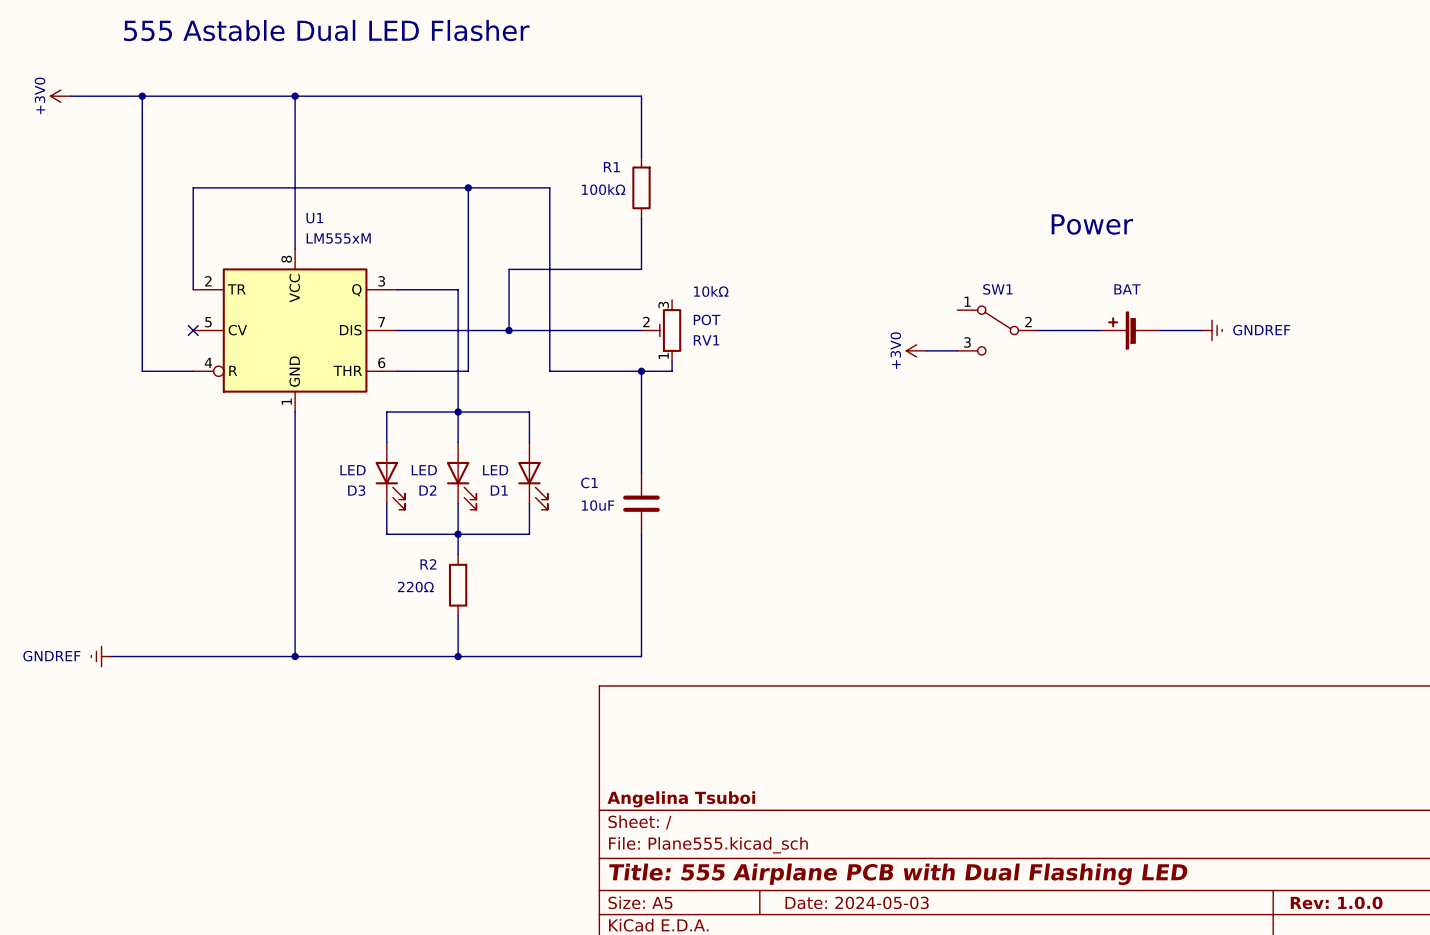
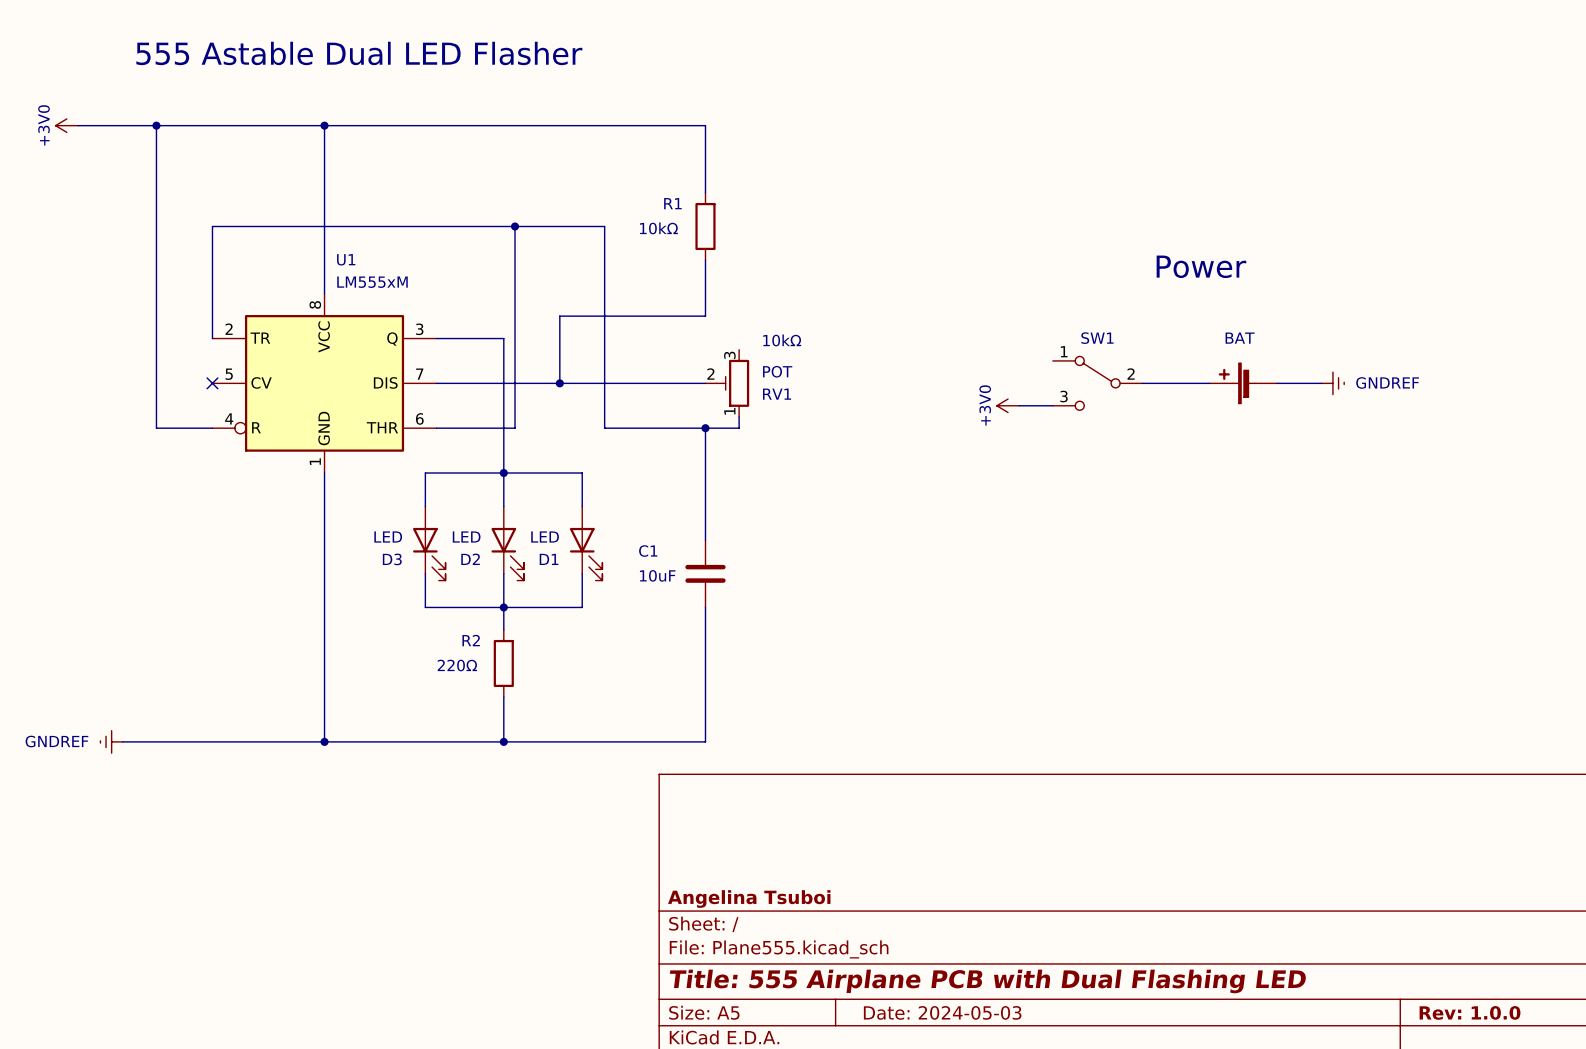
text: 100kΩ (603, 189) -> 10kΩ (658, 228)

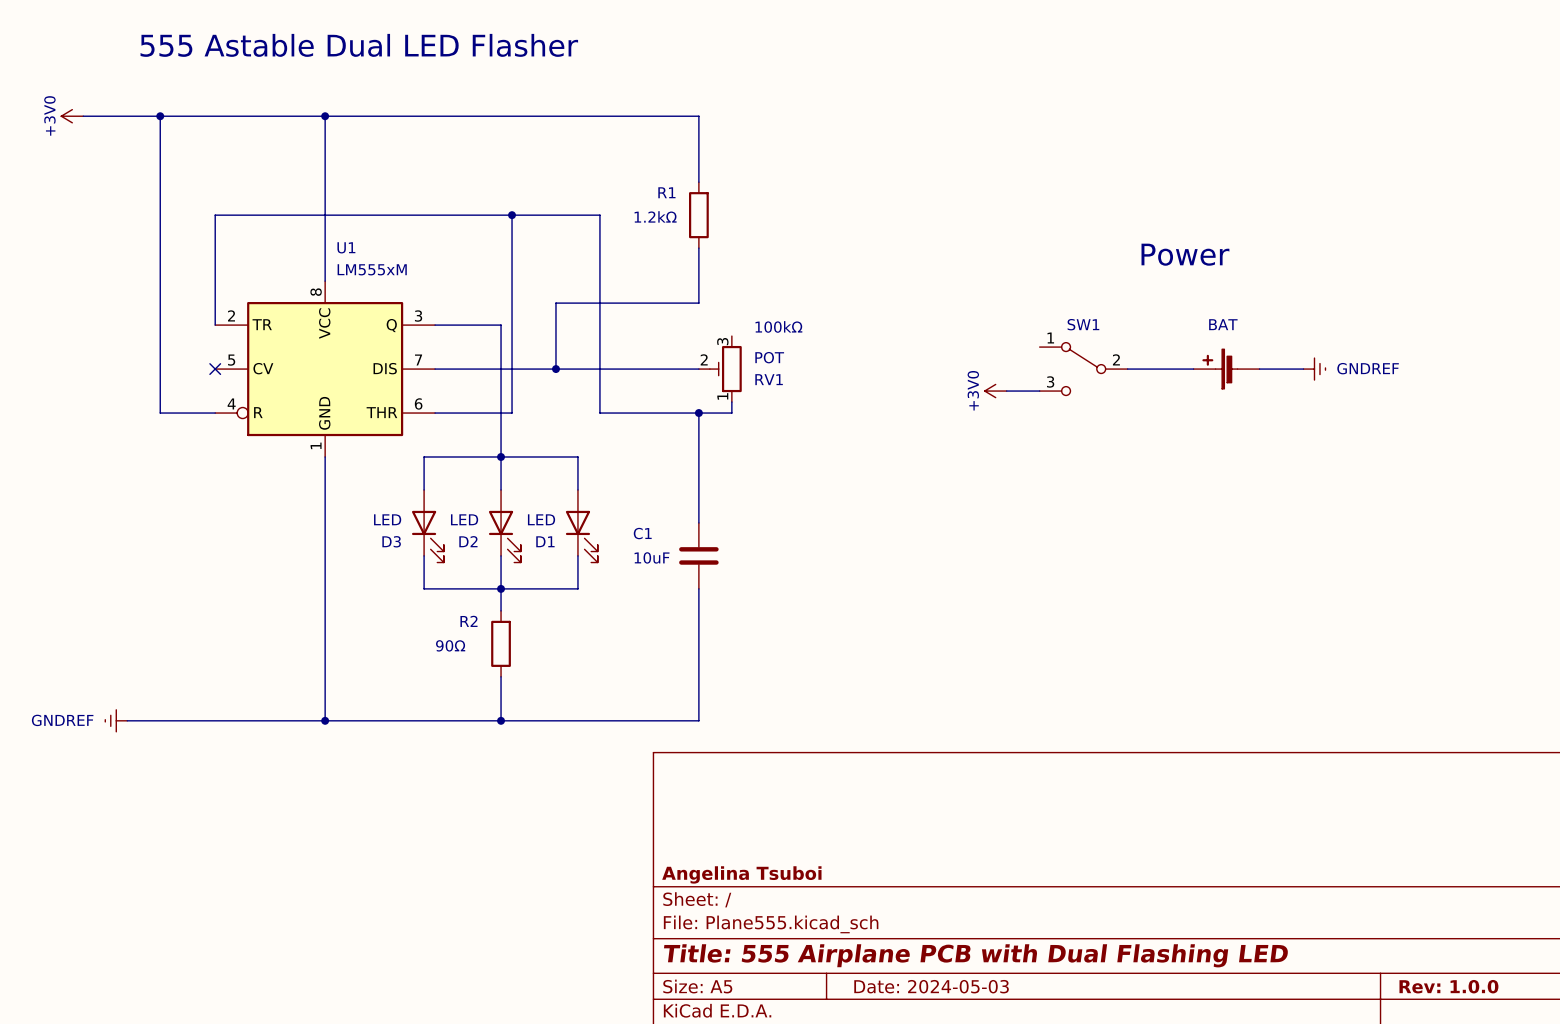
text: 10kΩ (658, 228) -> 1.2kΩ (655, 216)
text: 10kΩ (782, 340) -> 100kΩ (778, 326)
text: 220Ω (457, 665) -> 90Ω (450, 645)

